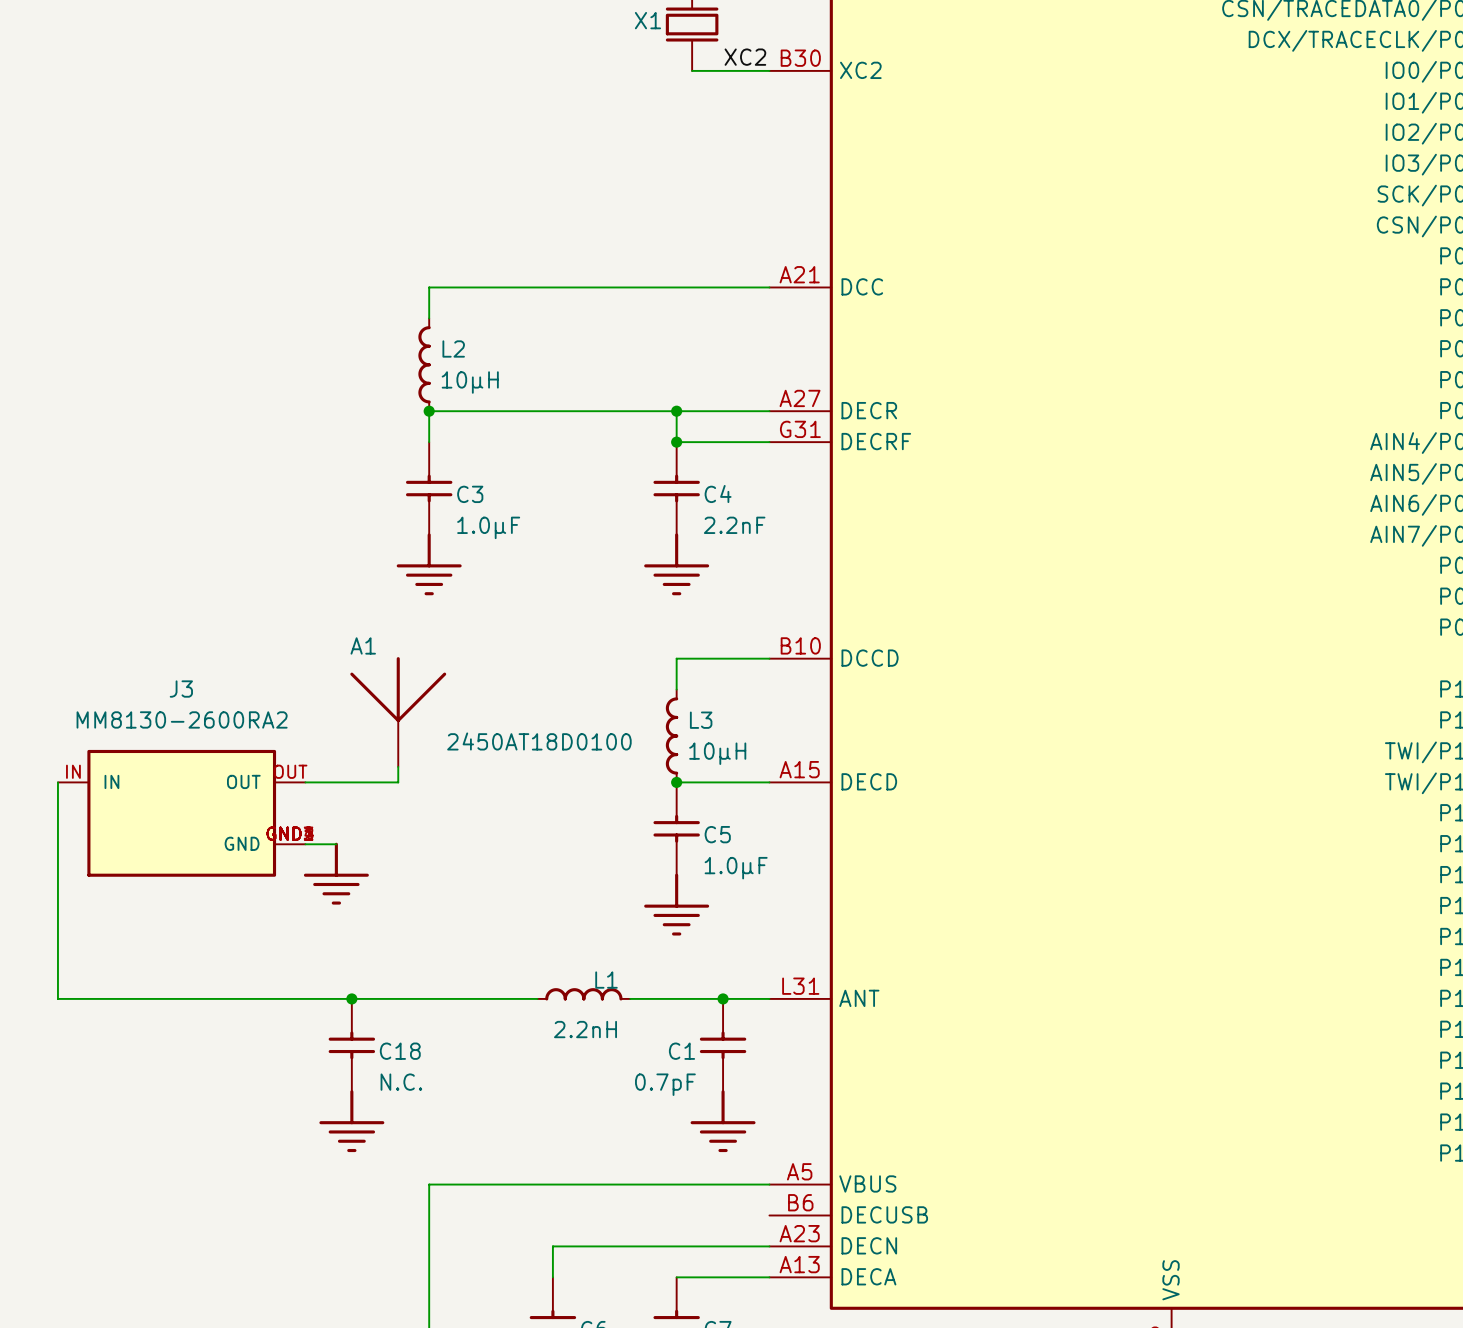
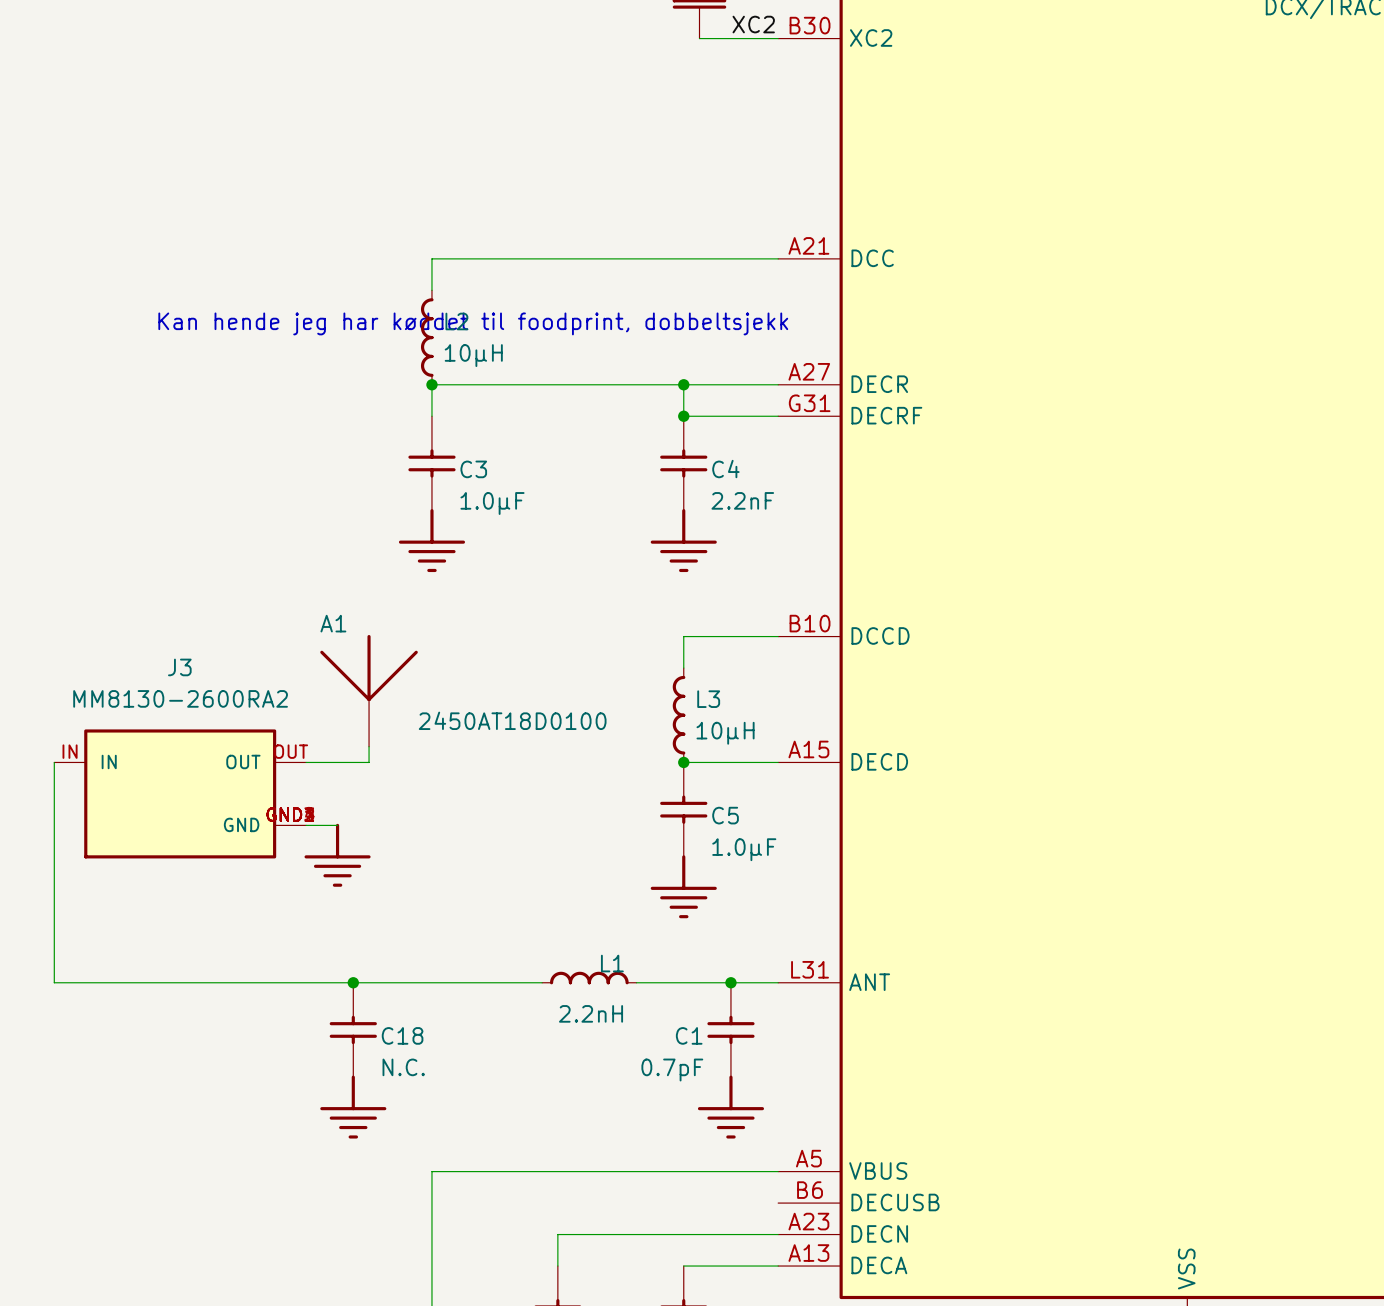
text: none -> Kan hende jeg har køddet til foodprint, dobbeltsjekk (473, 323)
A1 position: (398, 712) -> (369, 690)
wire: (398, 766) (398, 782) (367, 782) -> (369, 746) (369, 762)

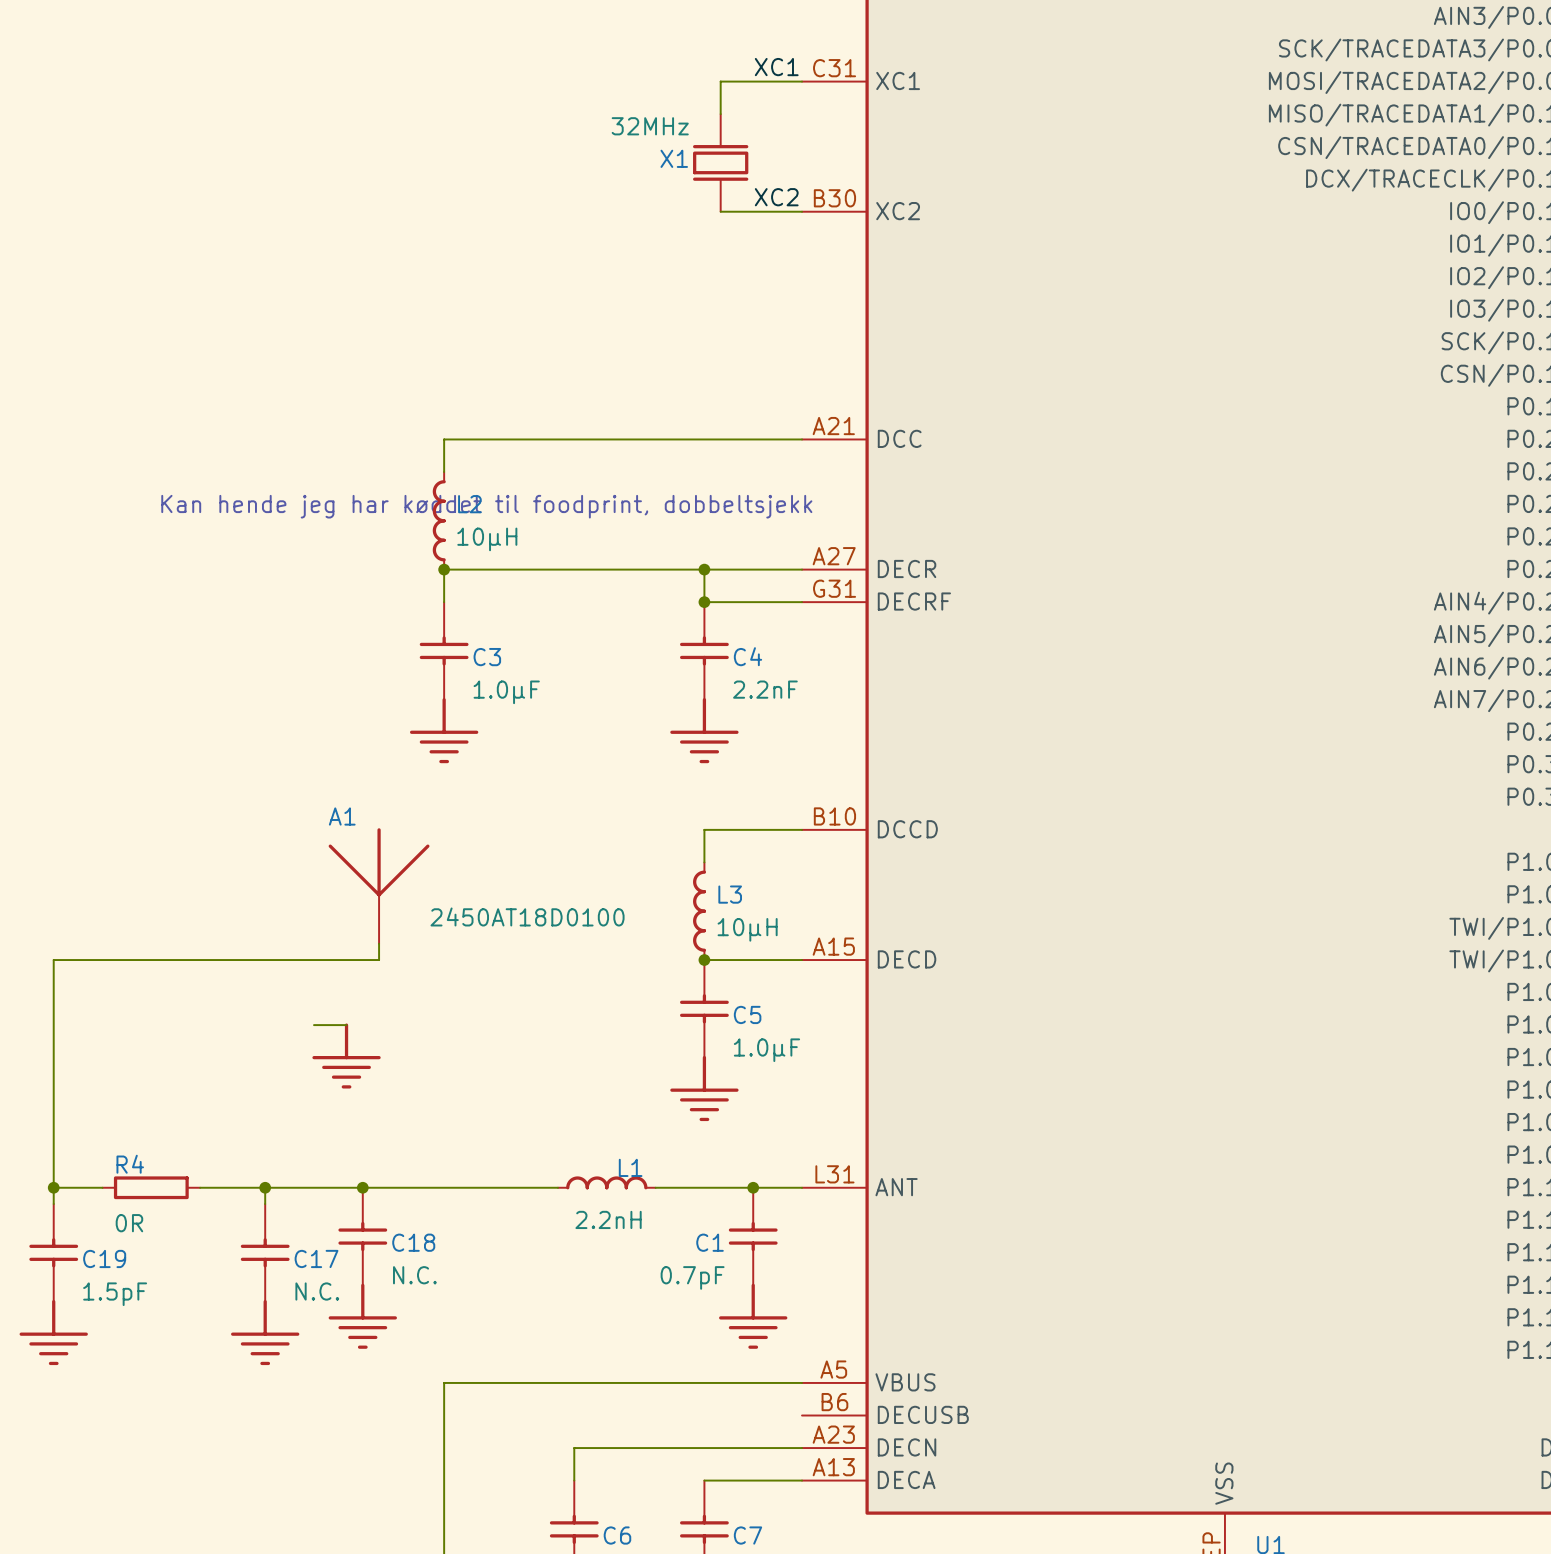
J3: MM8130-2600RA2 (180, 793) -> none
wire: none -> (53, 1187) (53, 1204)
junction: none -> (53, 1187)
wire: (101, 982) (195, 982) -> none
R4: none -> 0R (151, 1187)
wire: none -> (265, 1187) (265, 1204)
junction: none -> (265, 1187)
C19: none -> 1.5pF (53, 1252)
C17: none -> N.C. (265, 1252)
power symbol: none -> (53, 1332)
power symbol: none -> (265, 1332)

